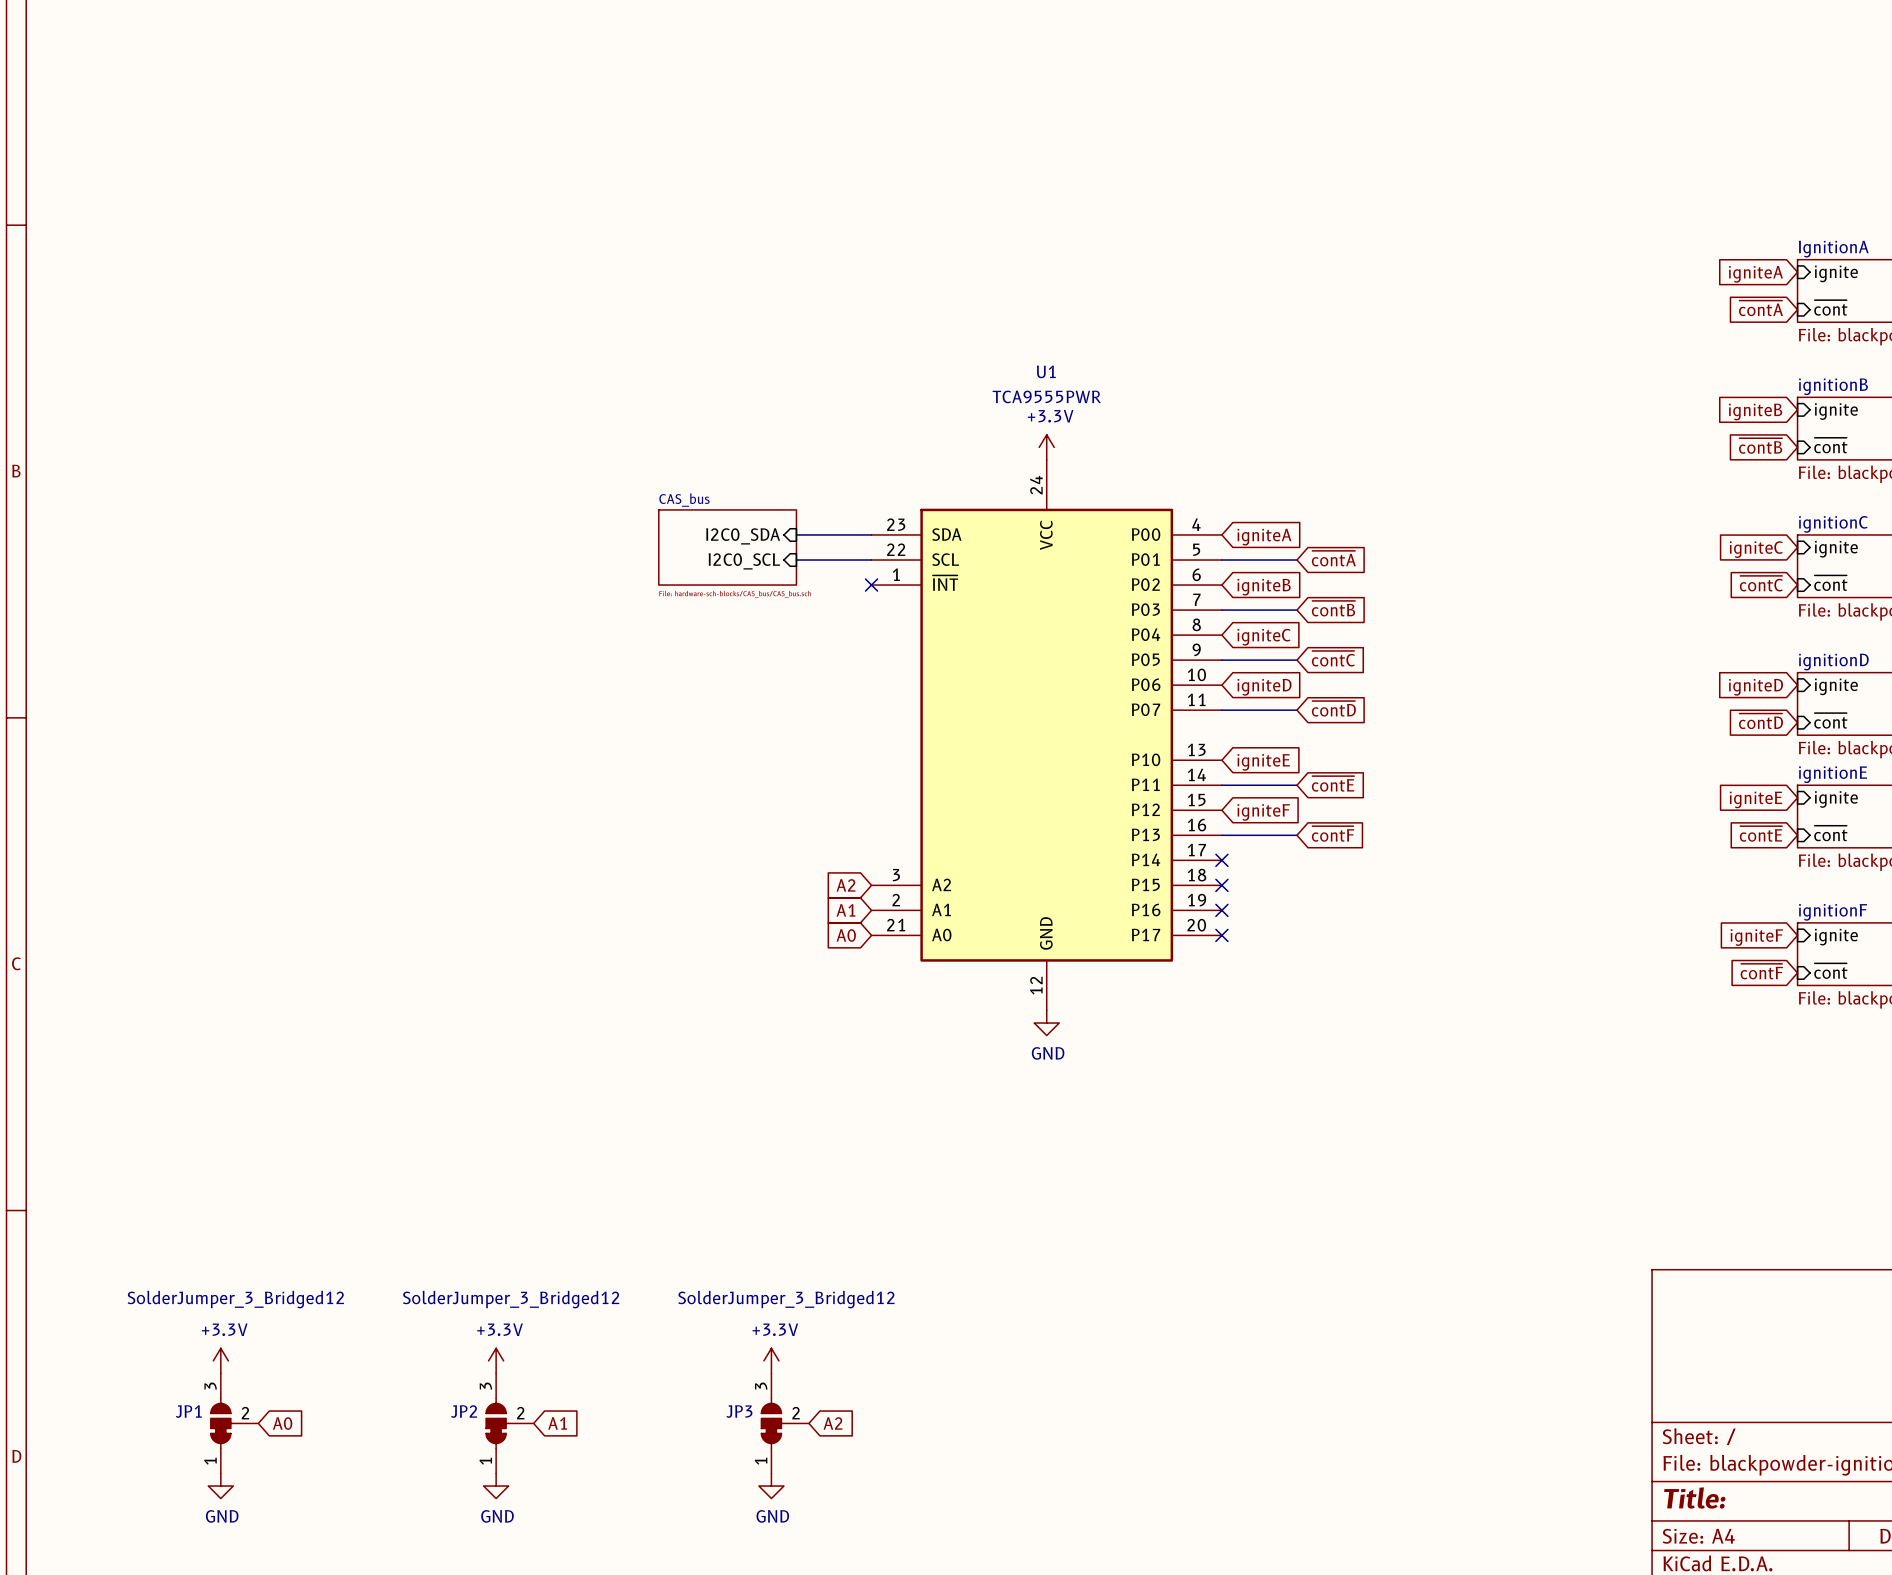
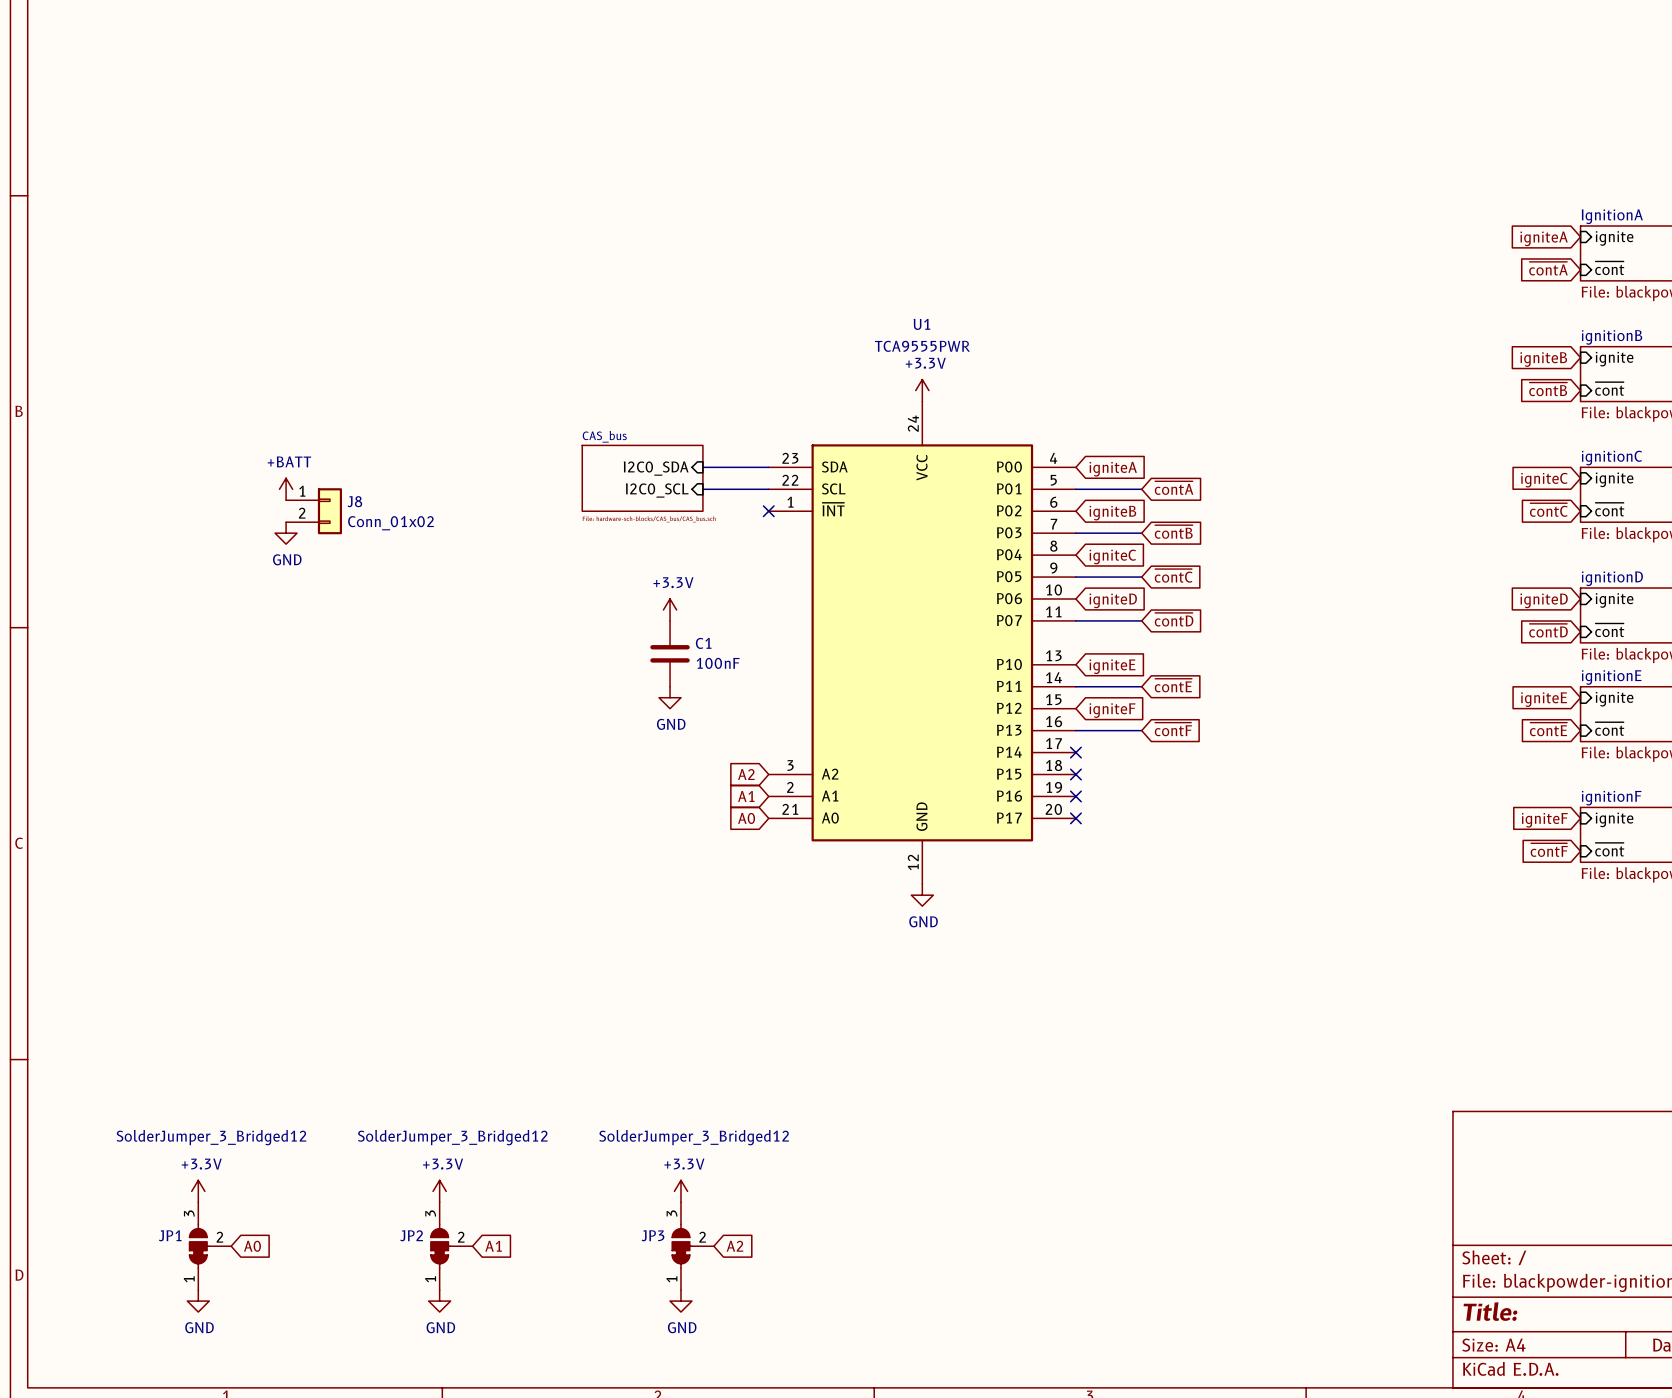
power symbol: none -> +BATT (286, 489)
J8: none -> Conn_01x02 (314, 511)
power symbol: none -> GND (286, 533)
power symbol: none -> +3.3V (670, 609)
C1: none -> 100nF (670, 653)
power symbol: none -> GND (670, 697)

